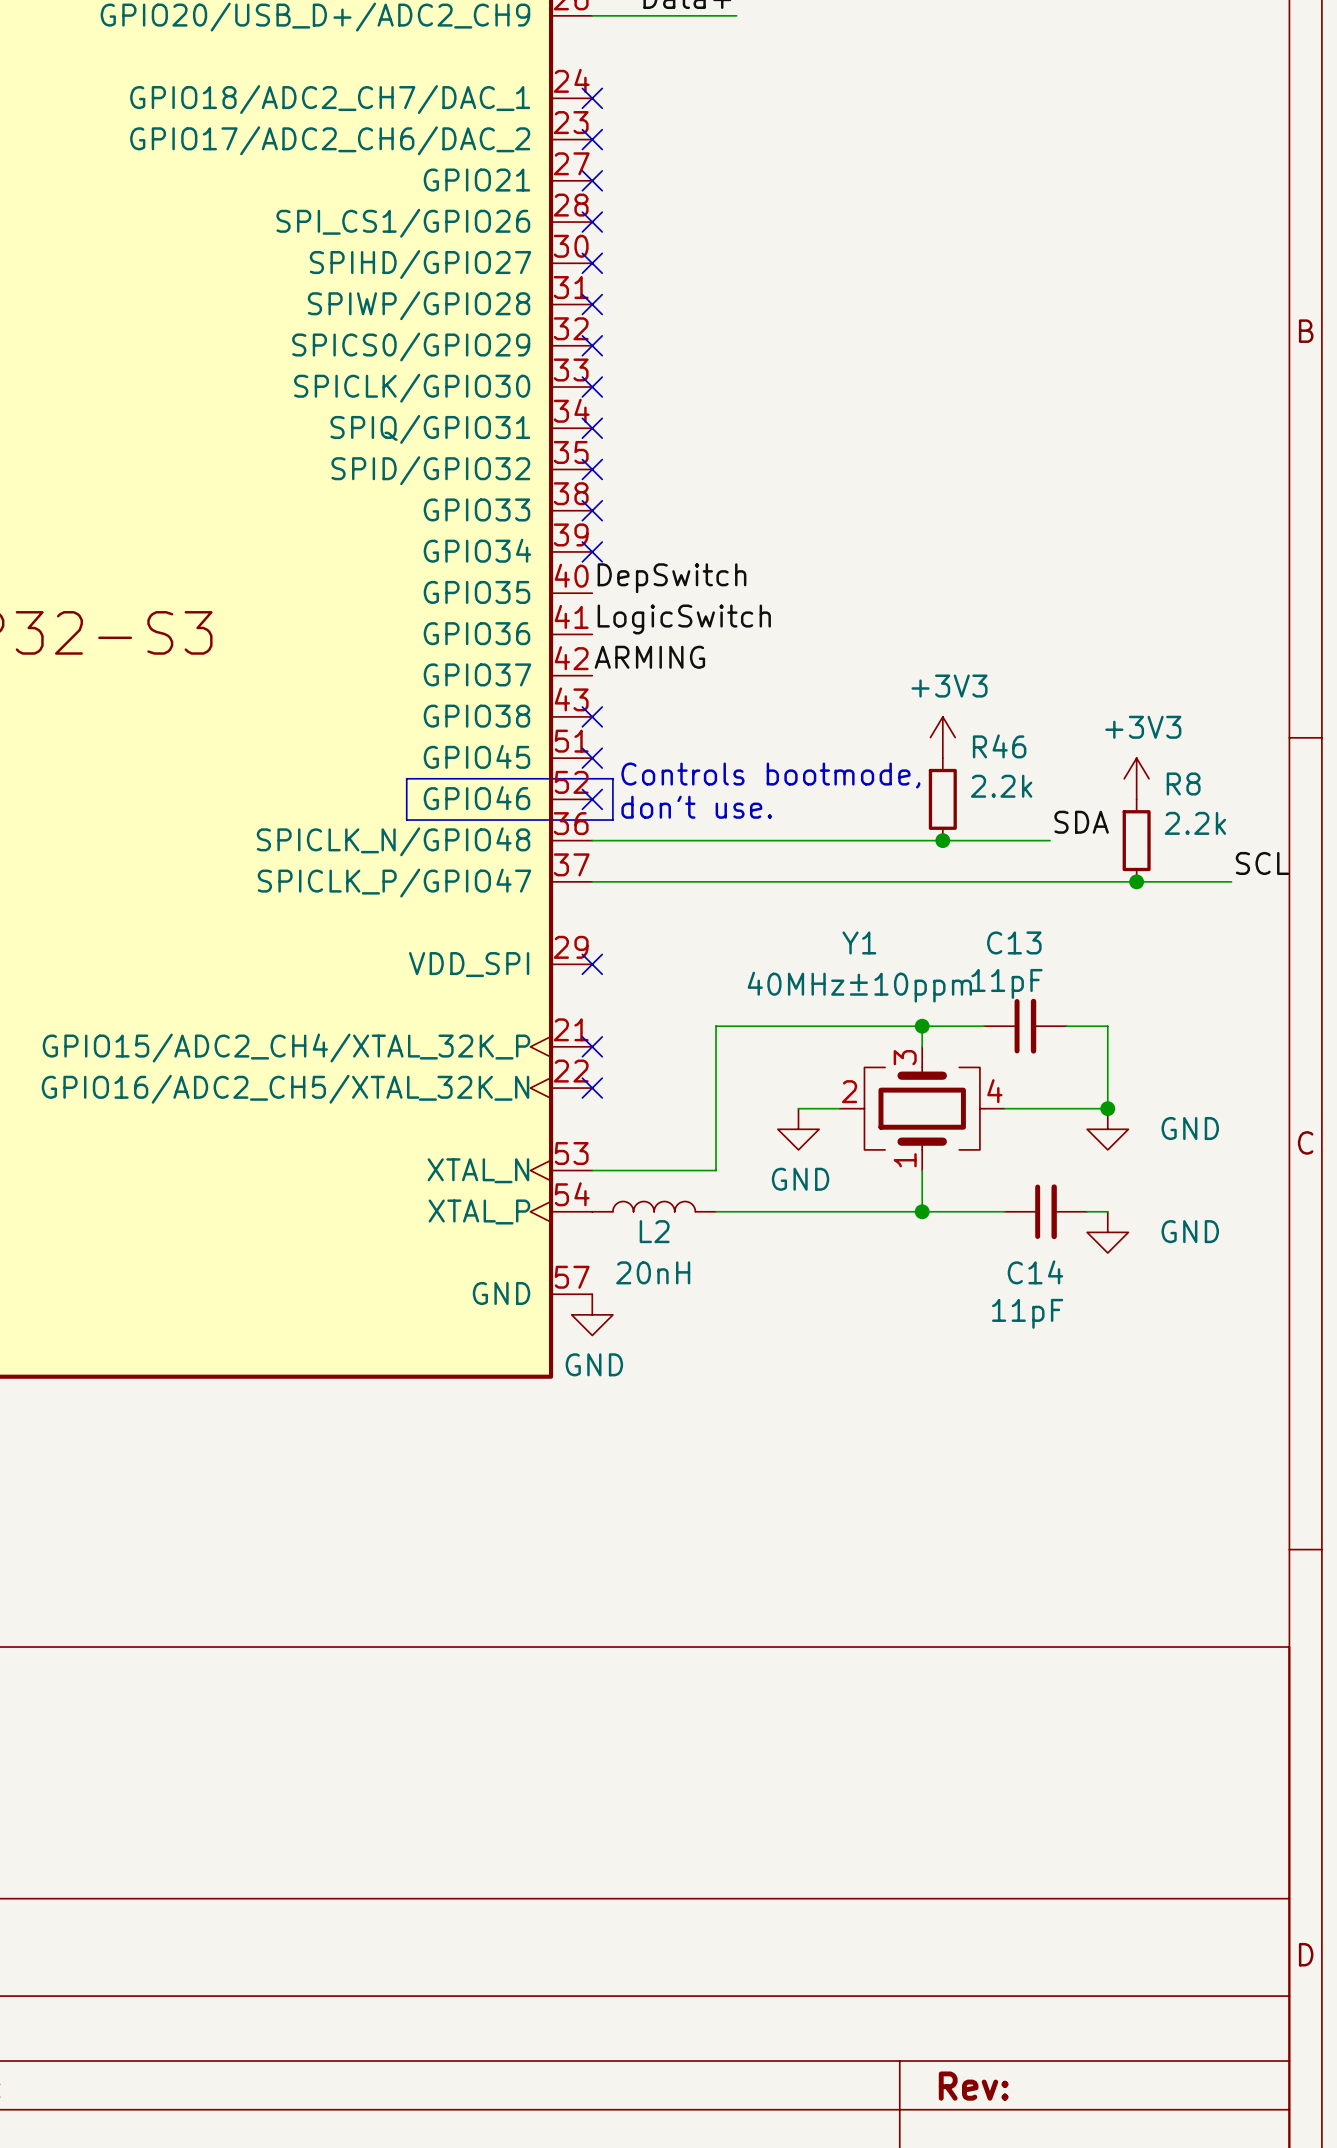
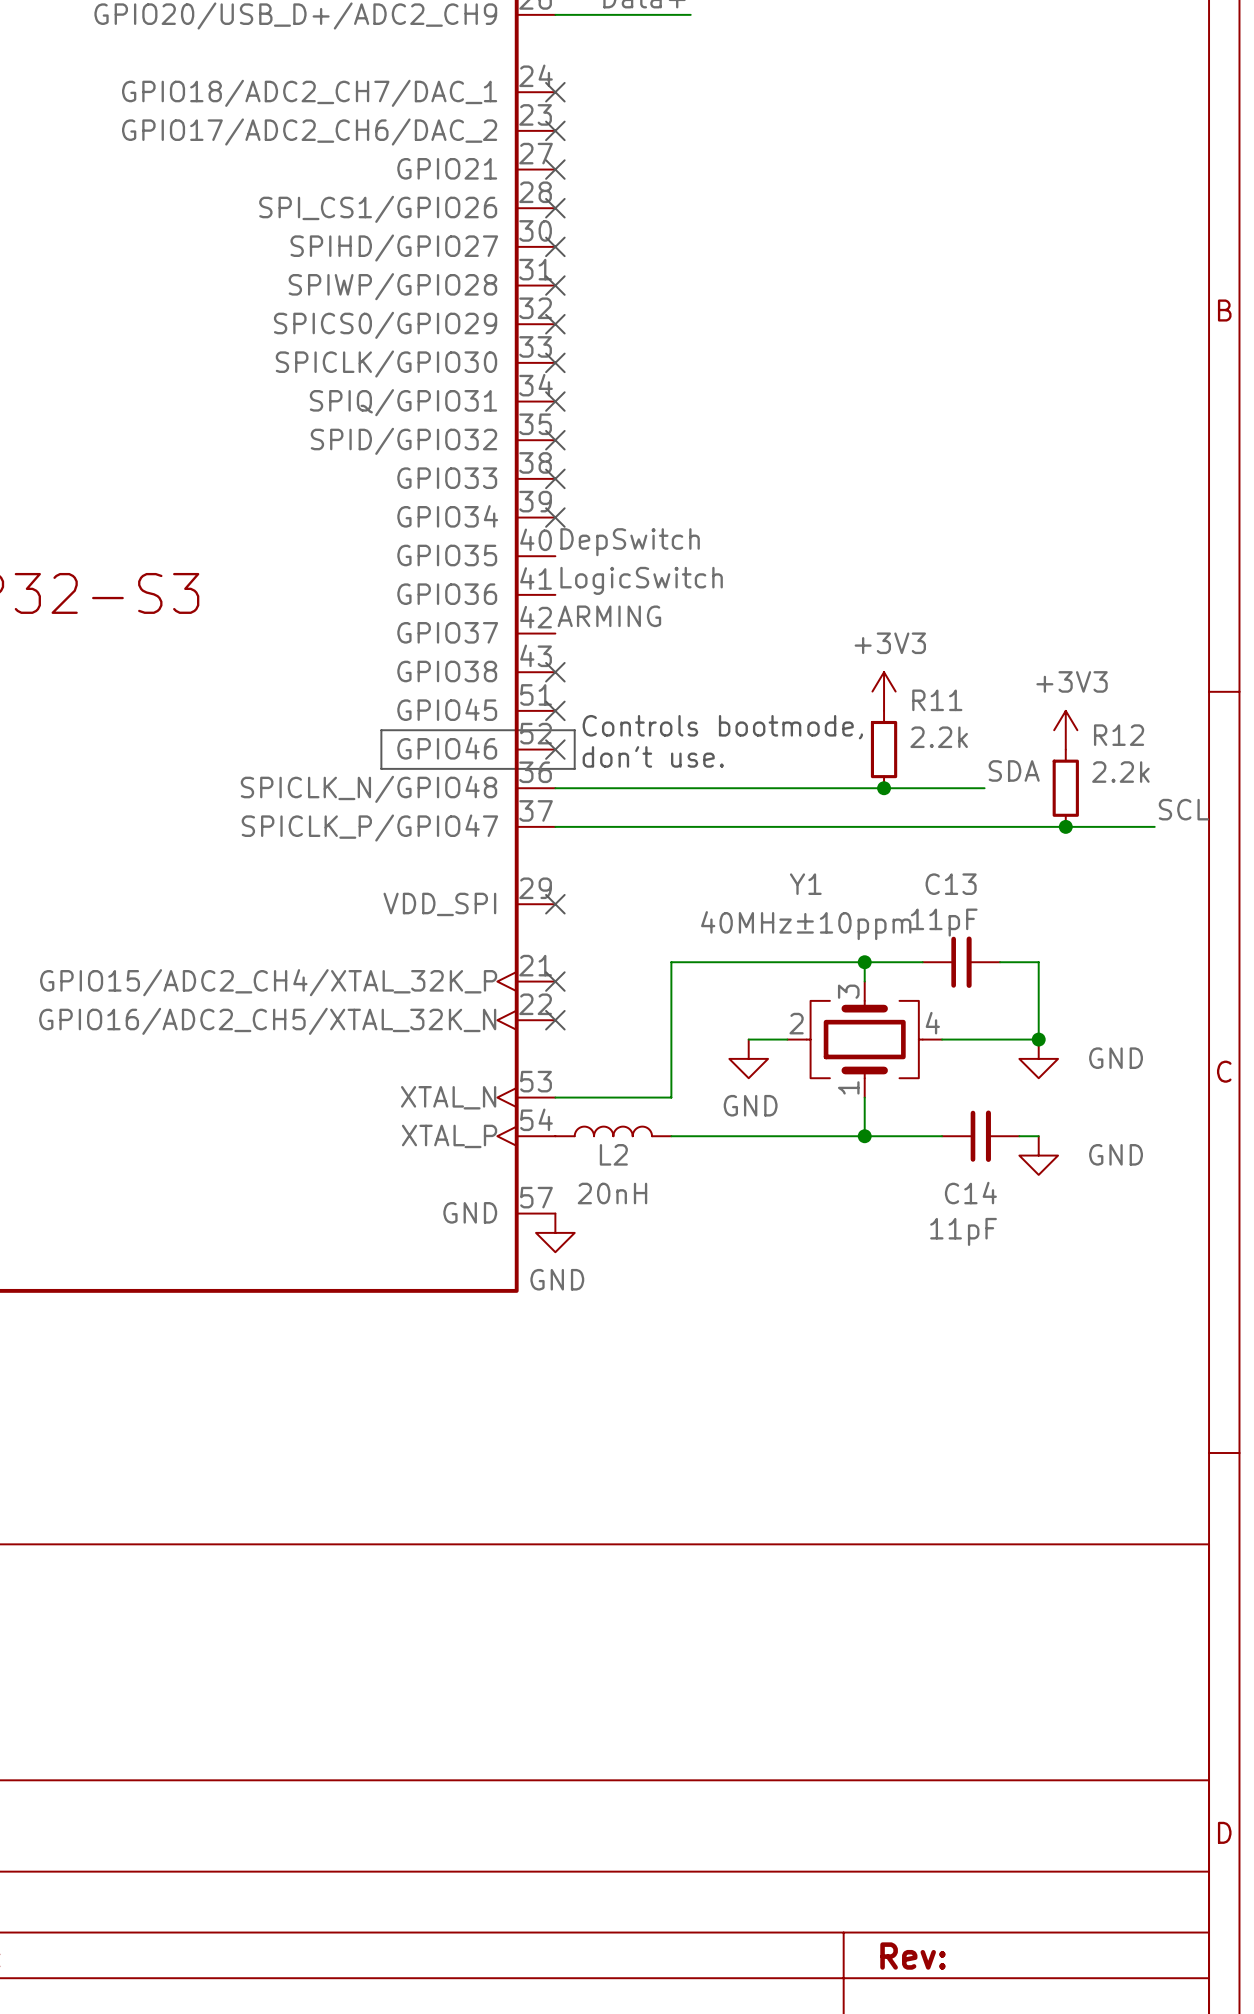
R46 name: R46 (999, 746) -> R11 (937, 700)
R8 name: R8 (1183, 784) -> R12 (1119, 735)

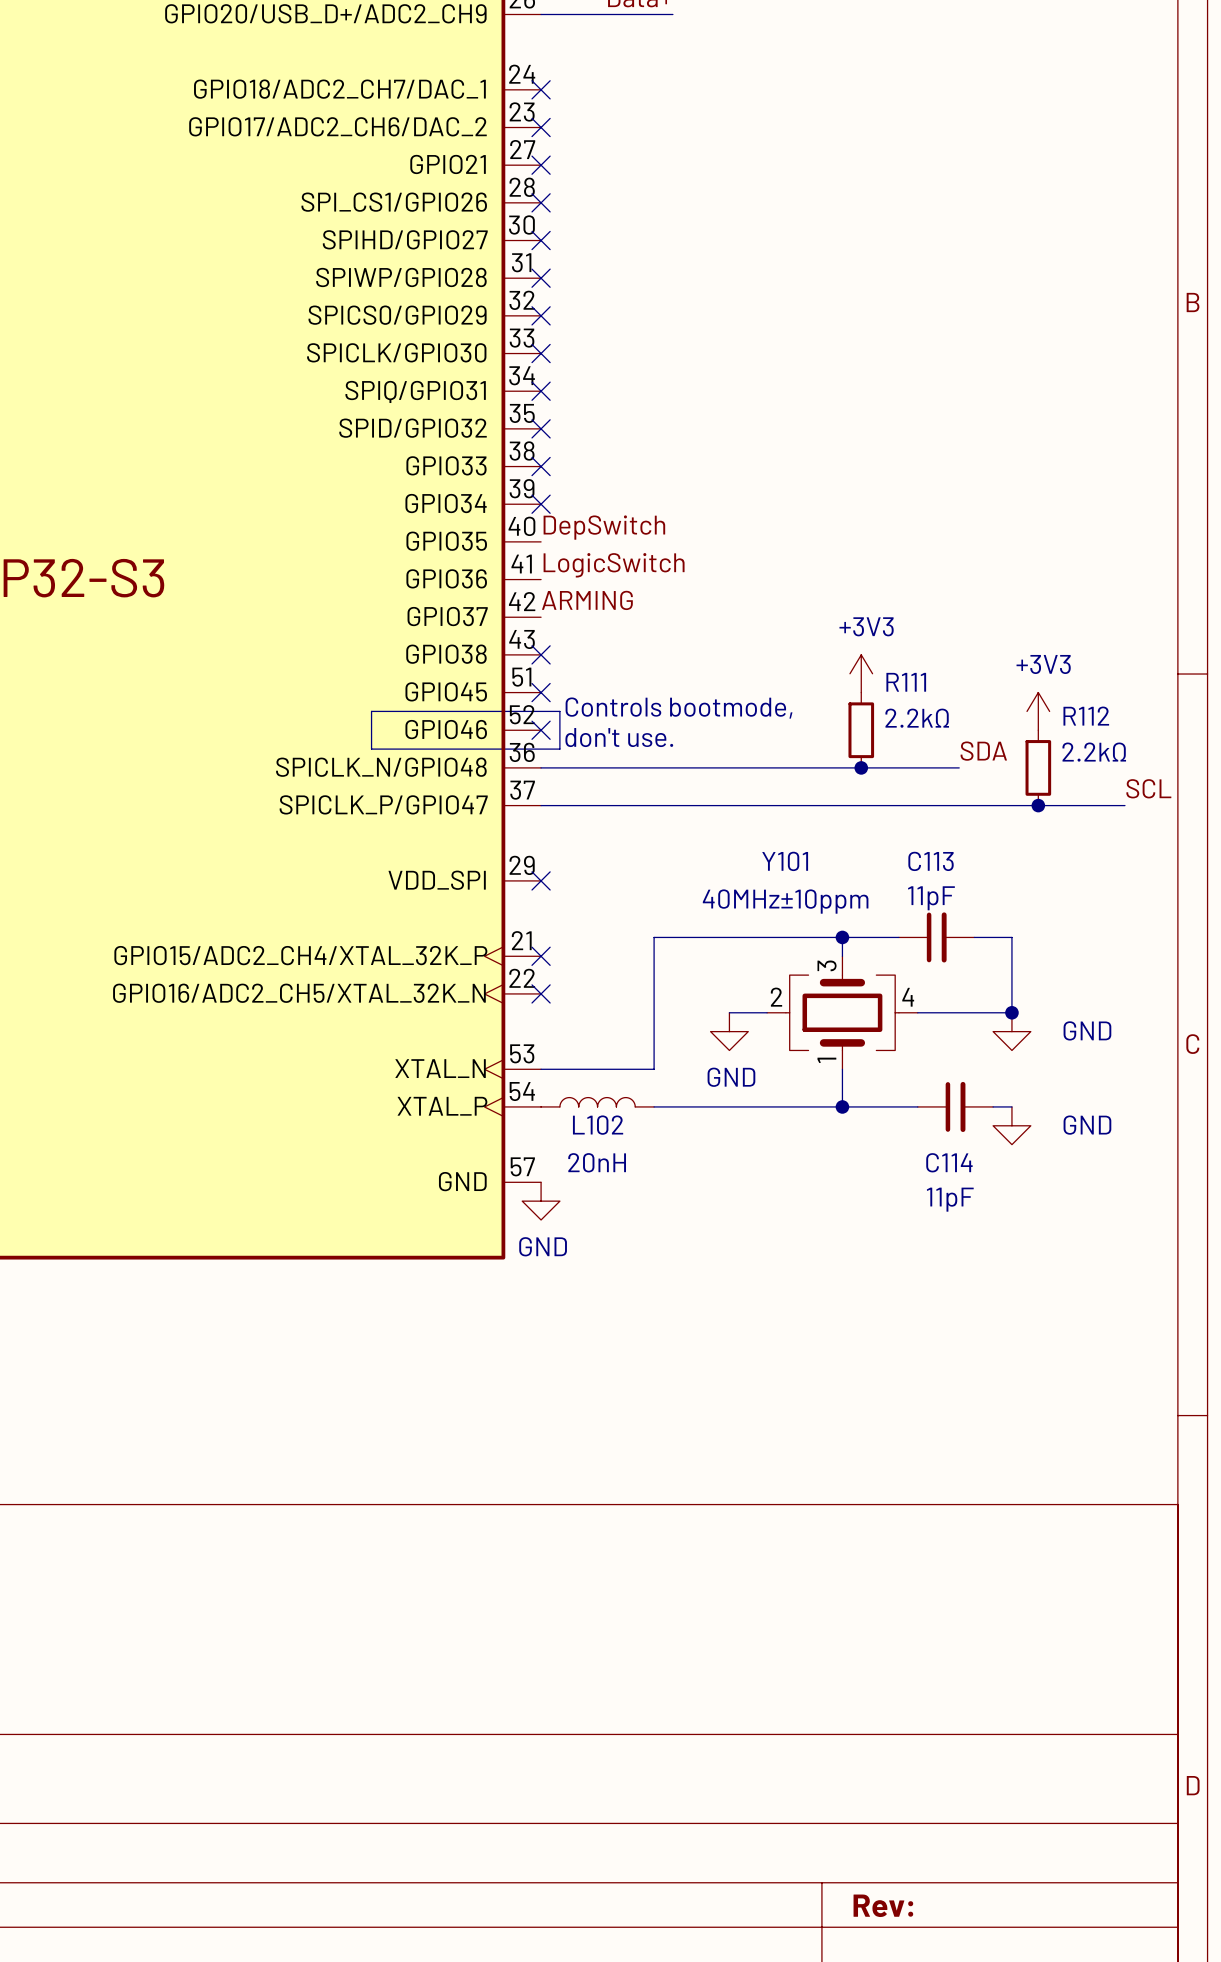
R11 name: R11 (937, 700) -> R111 (906, 682)
R12 name: R12 (1119, 735) -> R112 (1086, 716)
R11 value: 2.2k (939, 737) -> 2.2kΩ (917, 718)
R12 value: 2.2k (1120, 772) -> 2.2kΩ (1094, 752)
Y1 name: Y1 (805, 884) -> Y101 (785, 861)
C13 name: C13 (951, 884) -> C113 (931, 861)
L2 name: L2 (613, 1154) -> L102 (598, 1125)
C14 name: C14 (970, 1193) -> C114 (949, 1162)

